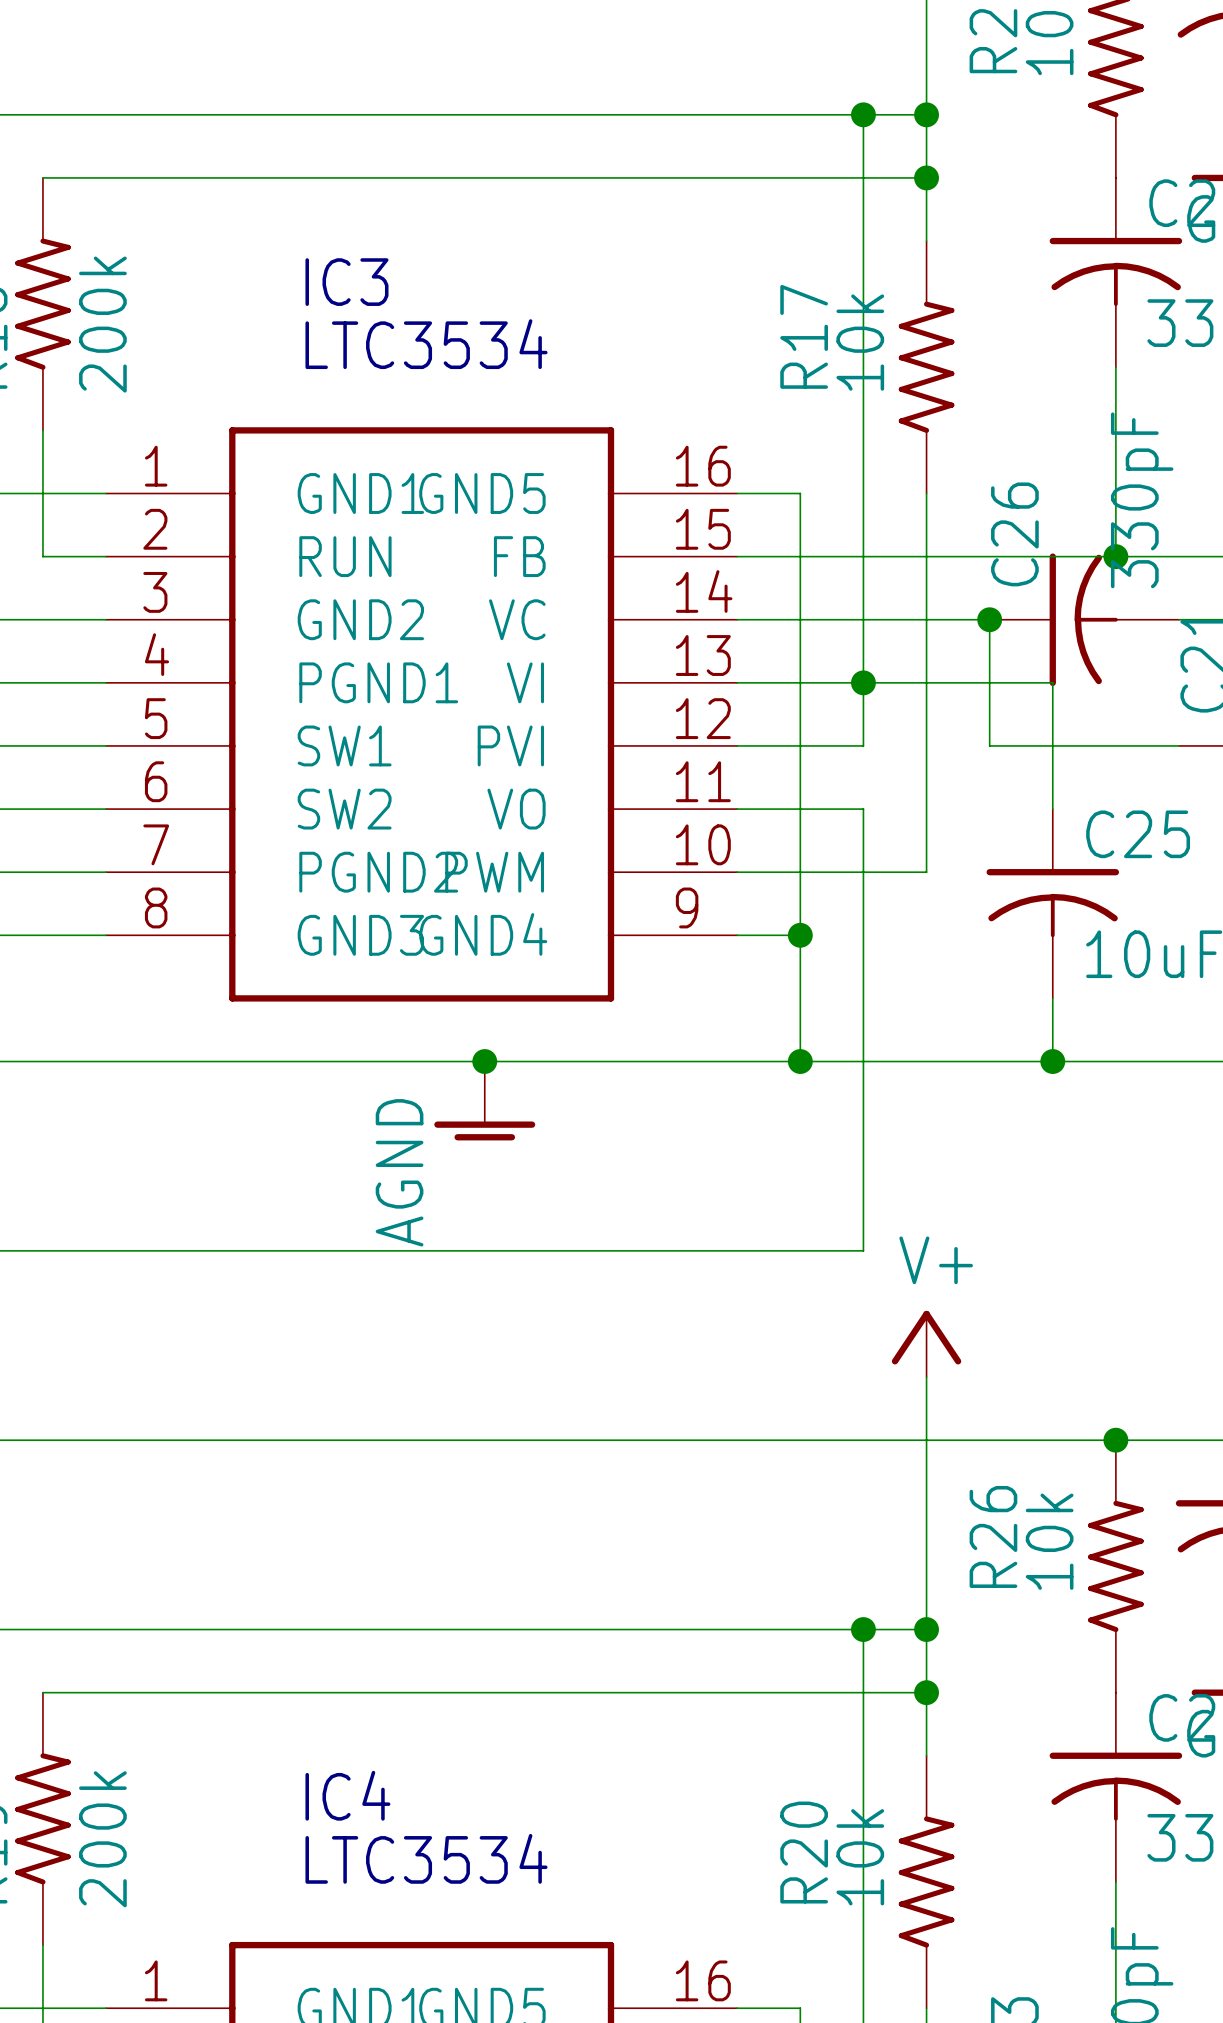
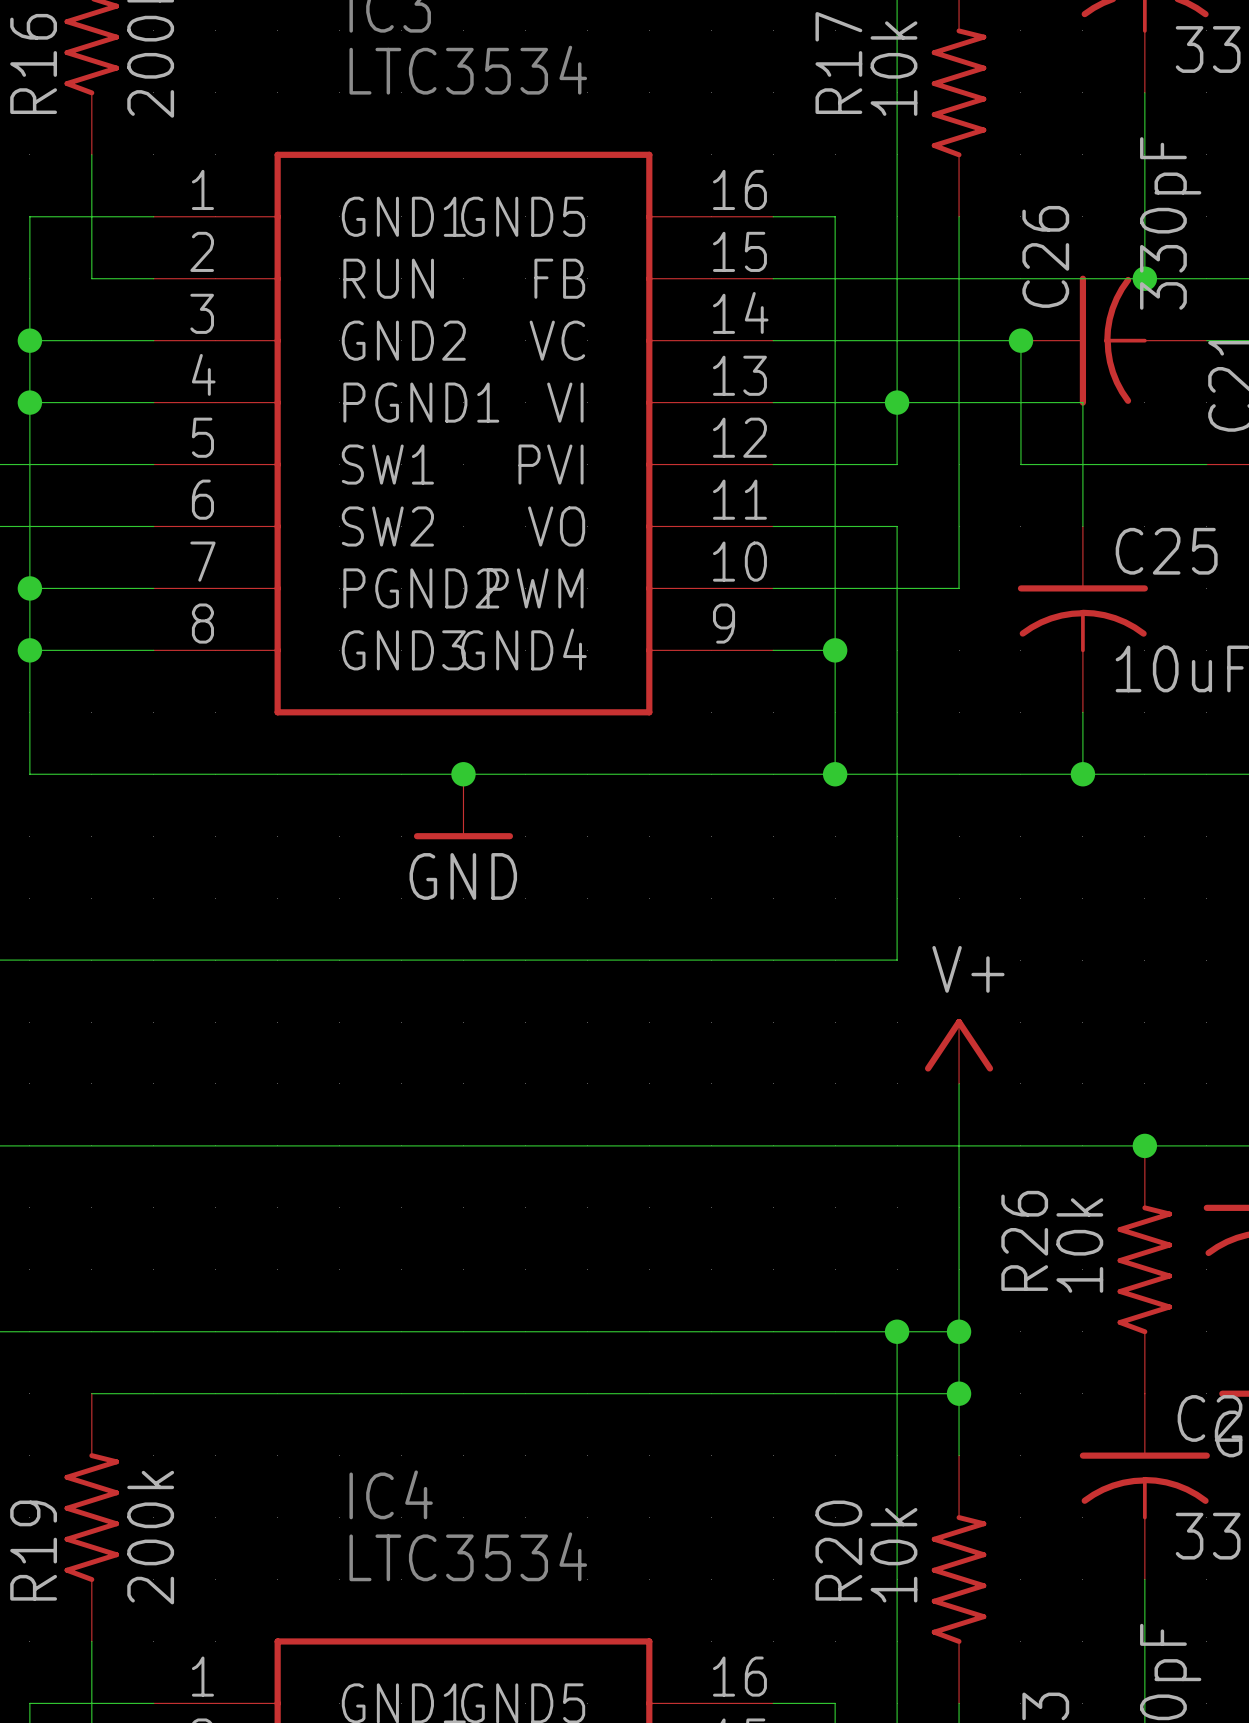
junction position: (484, 1061) -> (463, 774)
power symbol: none -> GND (463, 806)
power symbol: AGND (484, 1100) -> none

